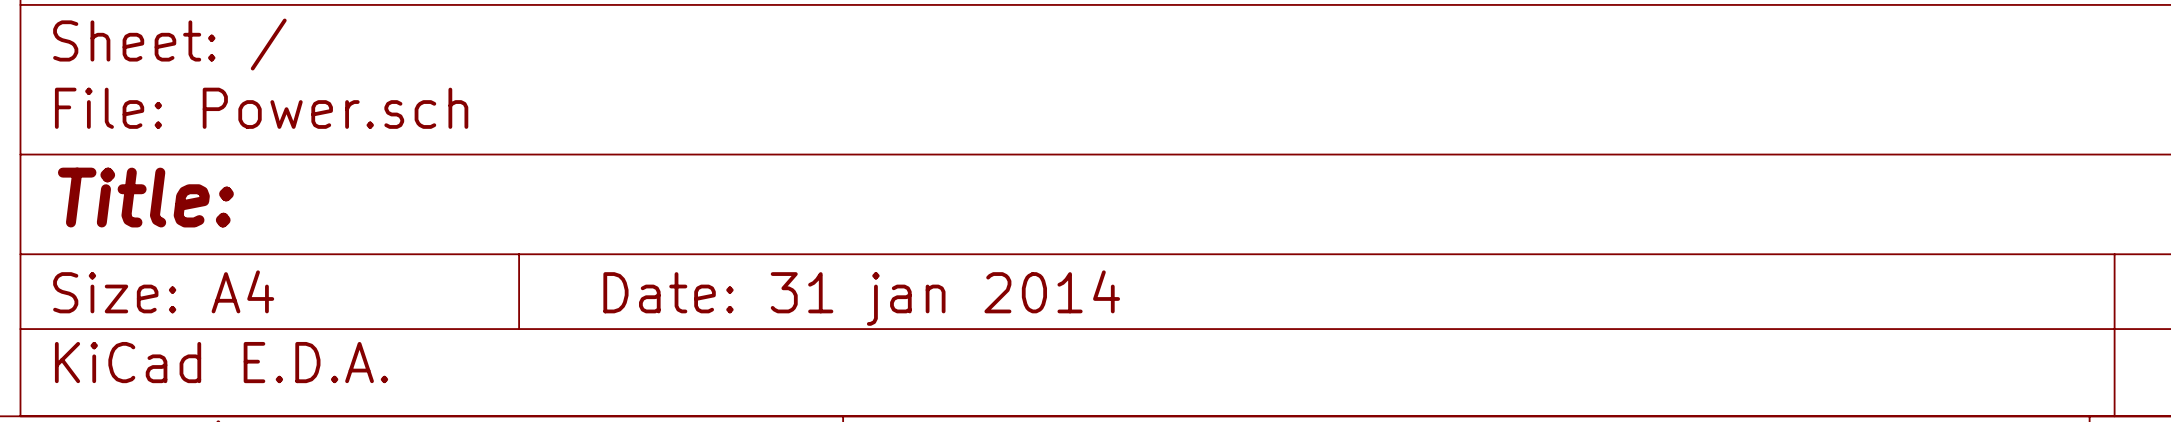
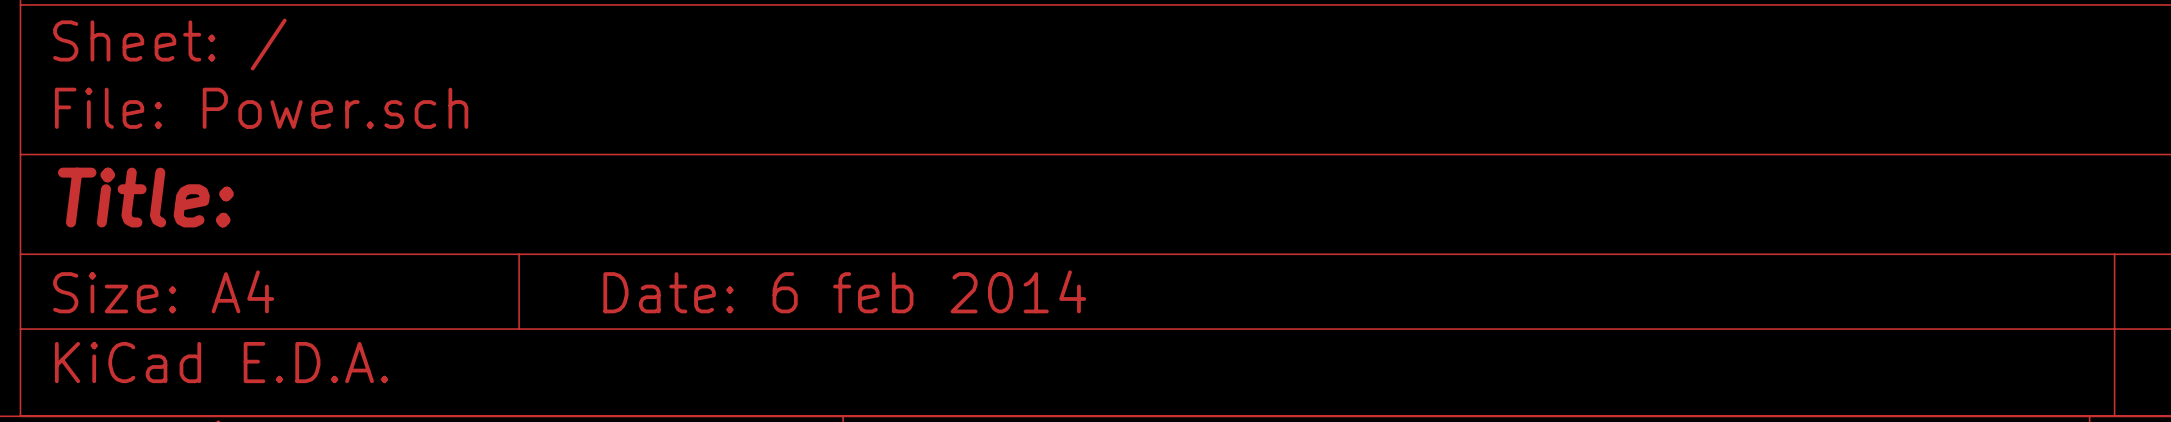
title block: Date: 31 jan 2014 (861, 298) -> Date: 6 feb 2014 (844, 291)

